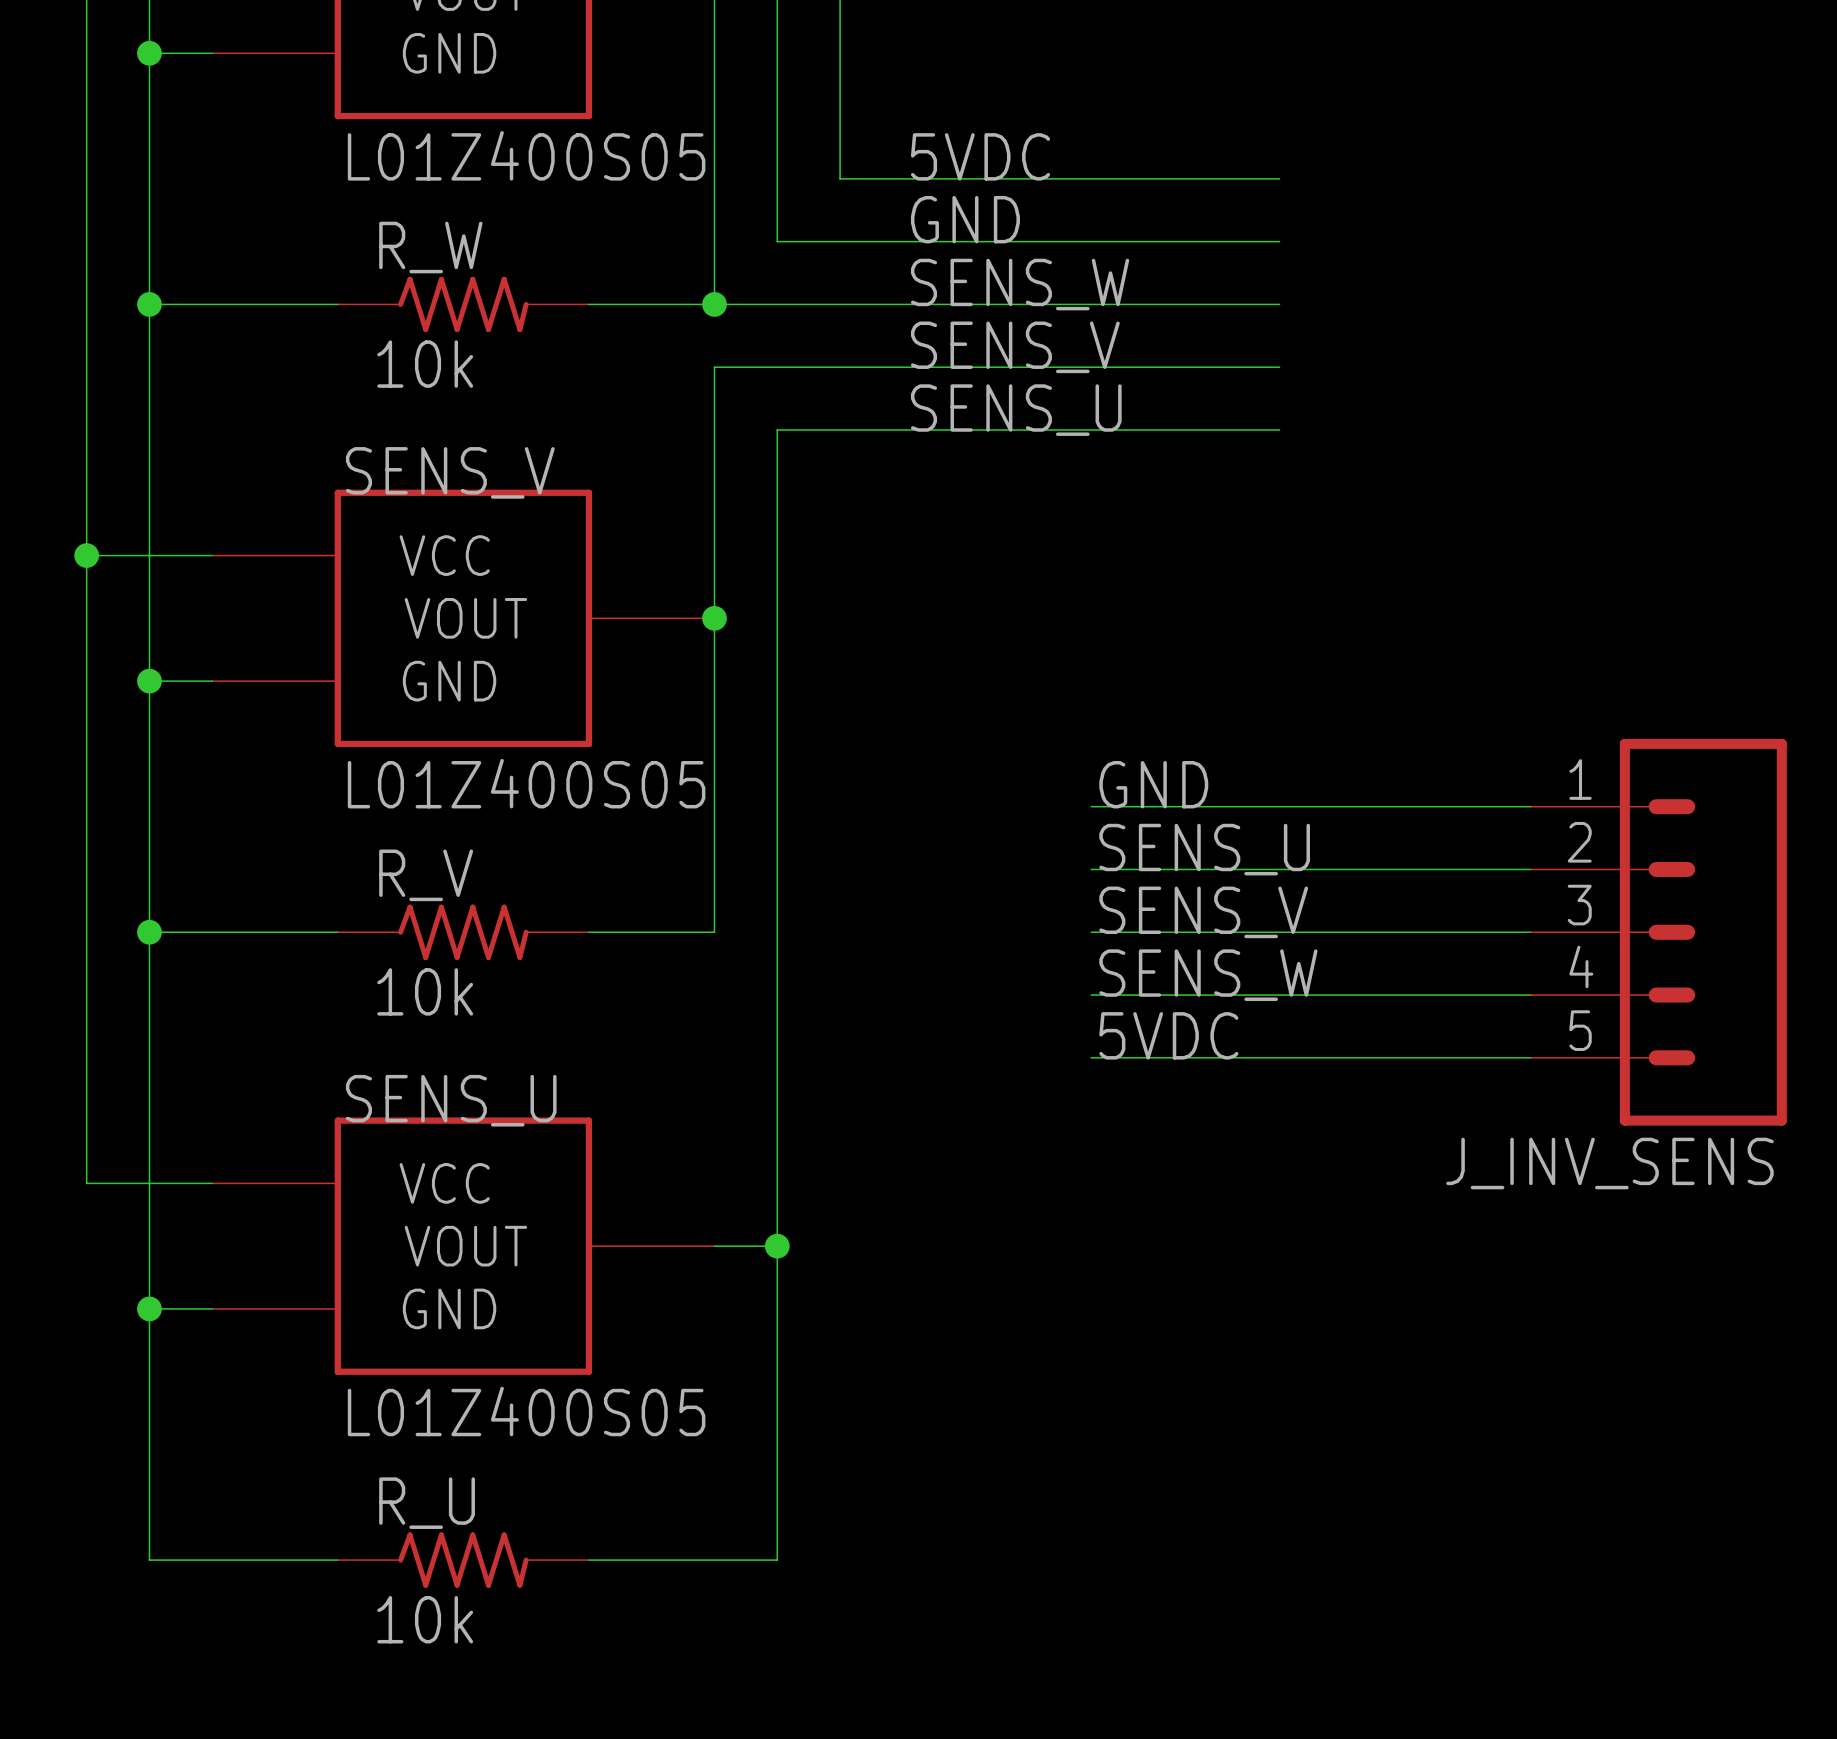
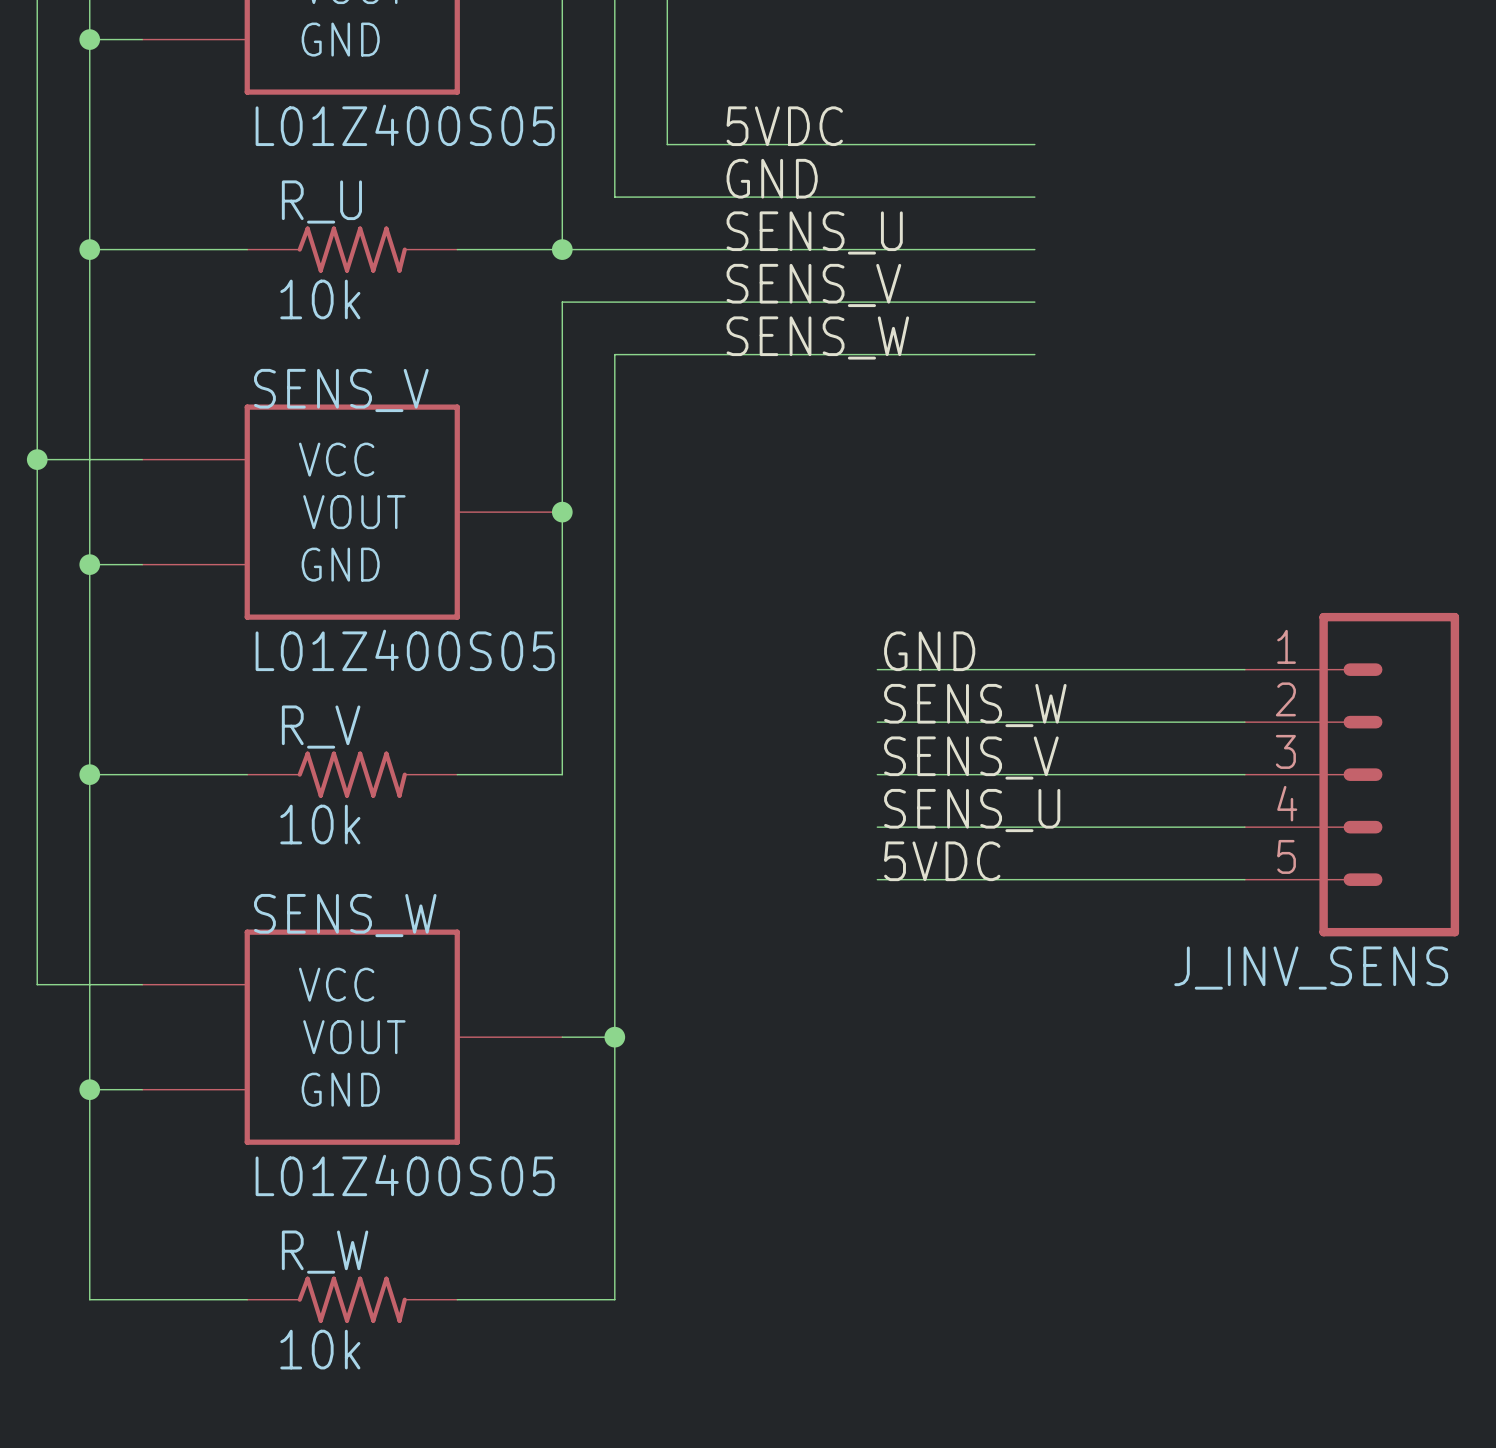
R_W name: R_W (430, 247) -> R_U (321, 201)
label: SENS_W (1020, 284) -> SENS_U (814, 232)
label: SENS_U (1016, 410) -> SENS_W (817, 337)
label: SENS_U (1204, 849) -> SENS_W (975, 705)
label: SENS_W (1208, 975) -> SENS_U (972, 810)
SENS_U name: SENS_U (451, 1100) -> SENS_W (345, 915)
R_U name: R_U (427, 1503) -> R_W (325, 1252)

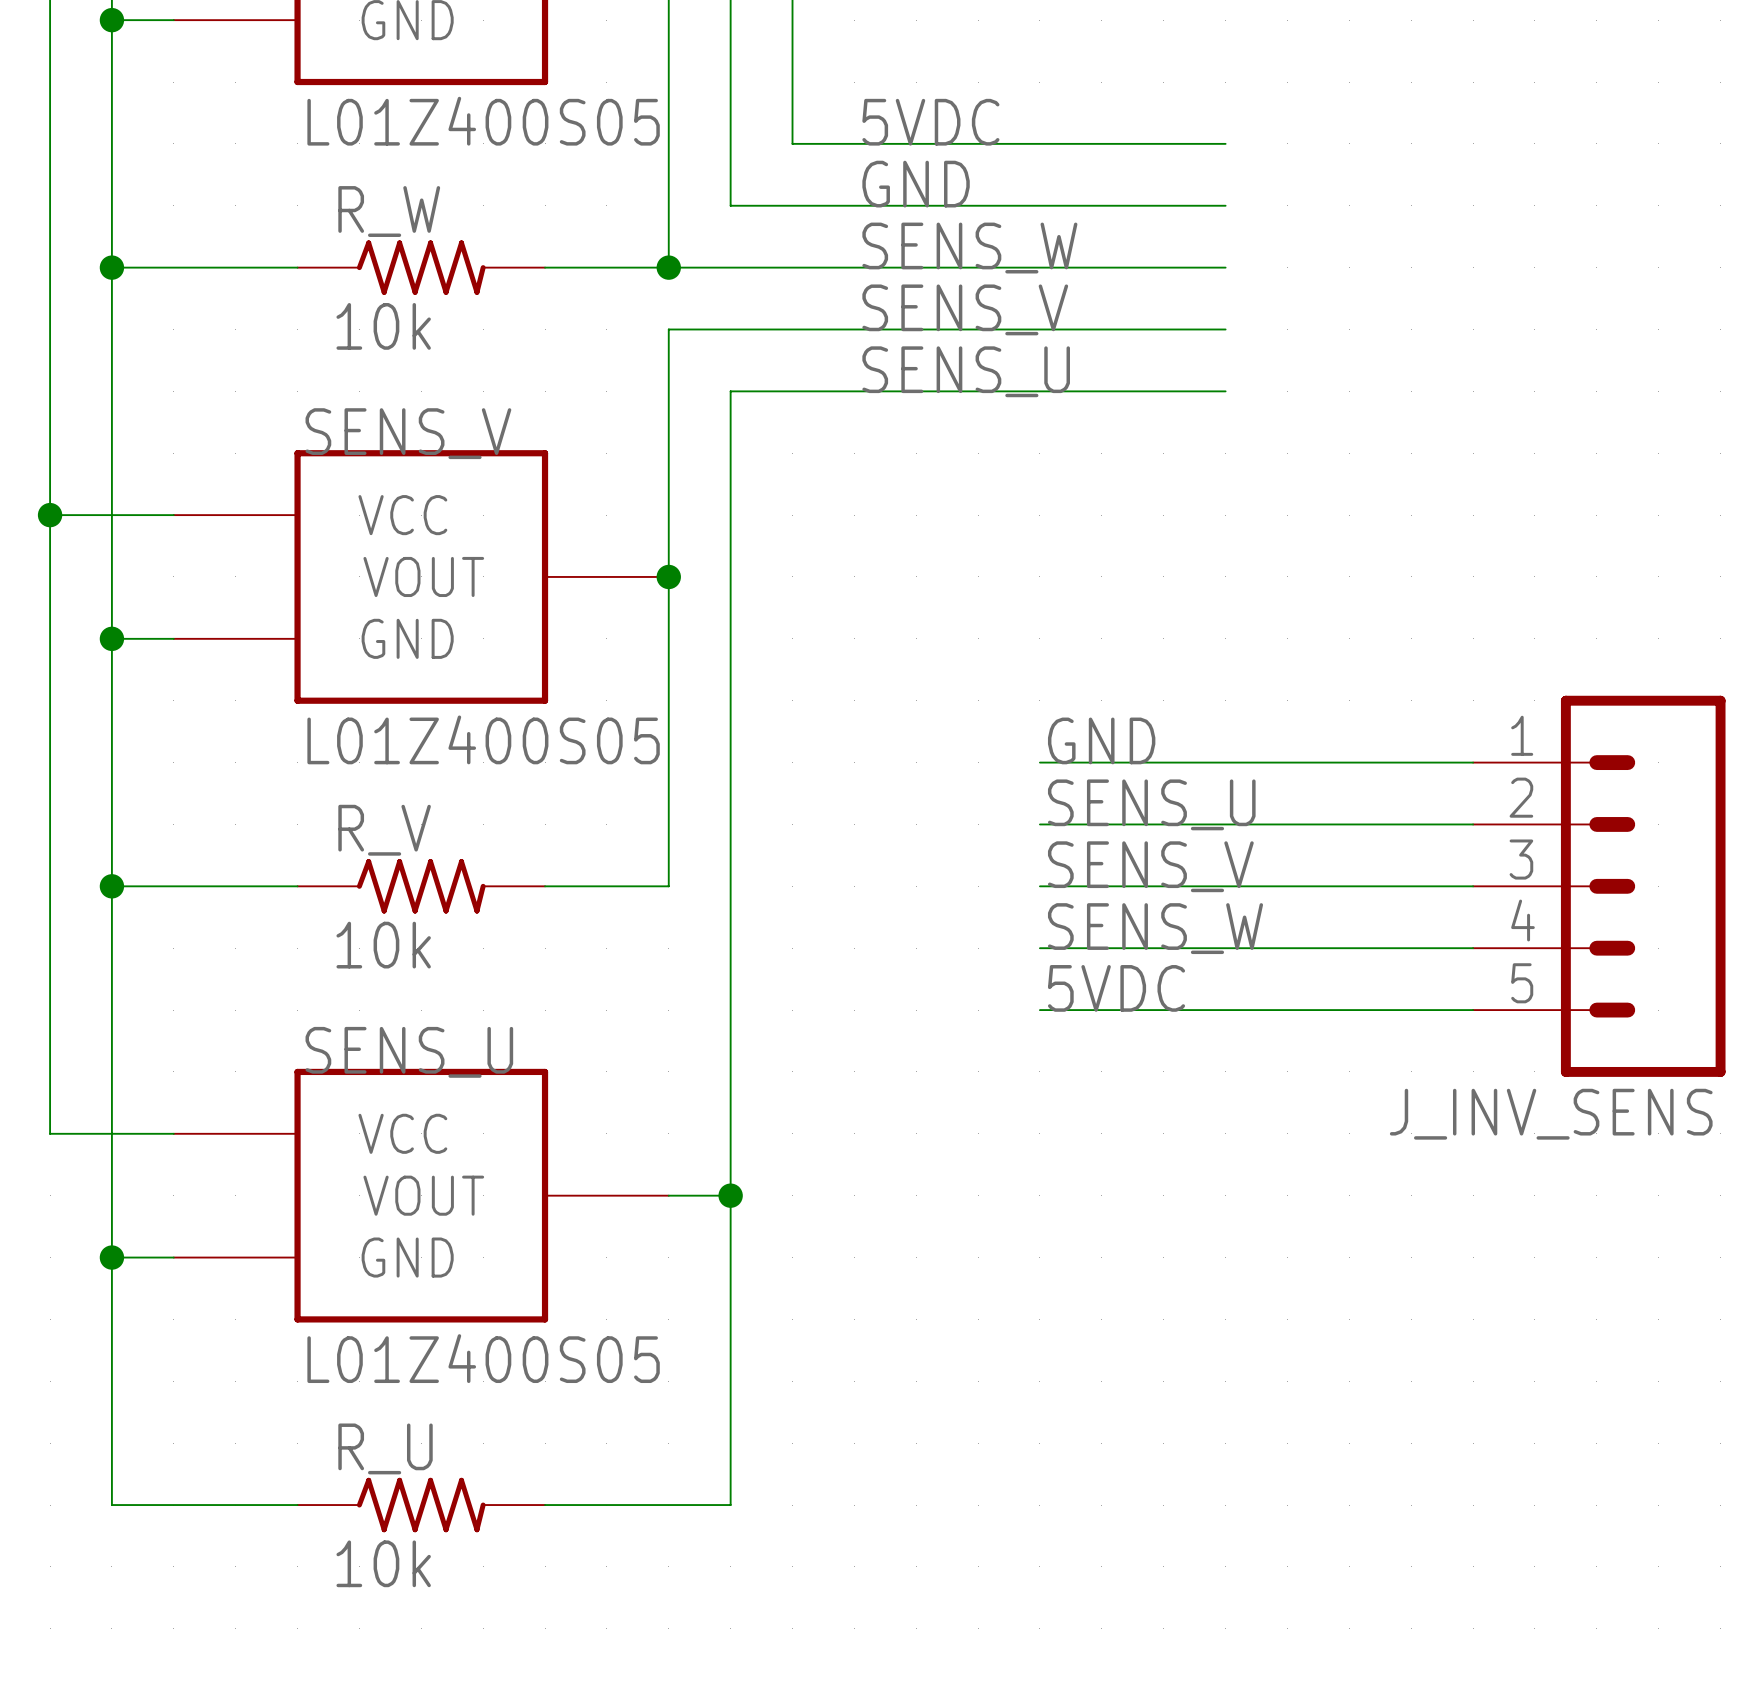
R_U name: R_U (321, 201) -> R_W (389, 211)
label: SENS_U (814, 232) -> SENS_W (969, 248)
label: SENS_W (817, 337) -> SENS_U (966, 371)
label: SENS_W (975, 705) -> SENS_U (1151, 804)
label: SENS_U (972, 810) -> SENS_W (1155, 928)
SENS_W name: SENS_W (345, 915) -> SENS_U (409, 1052)
R_W name: R_W (325, 1252) -> R_U (385, 1448)

